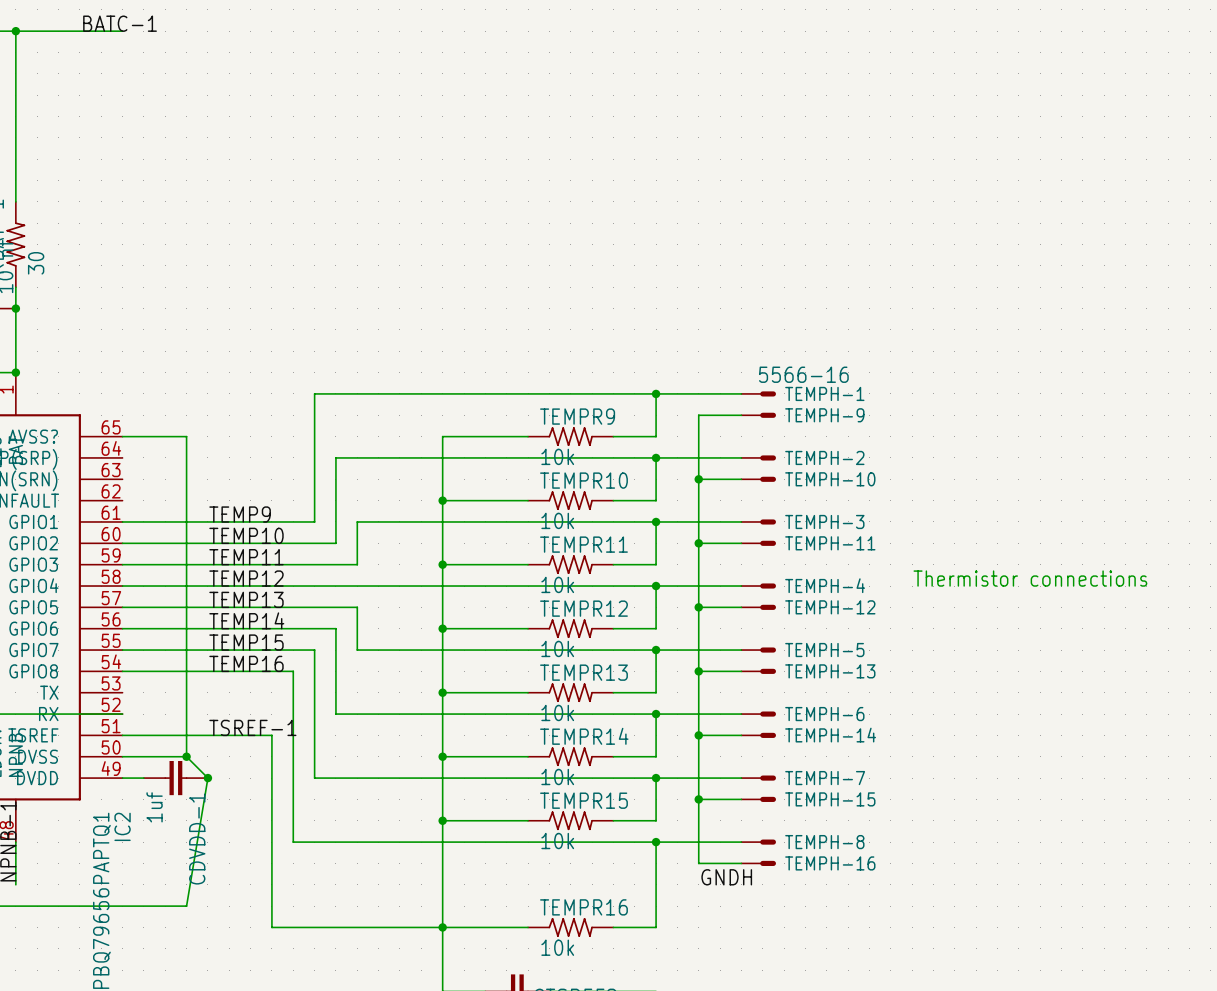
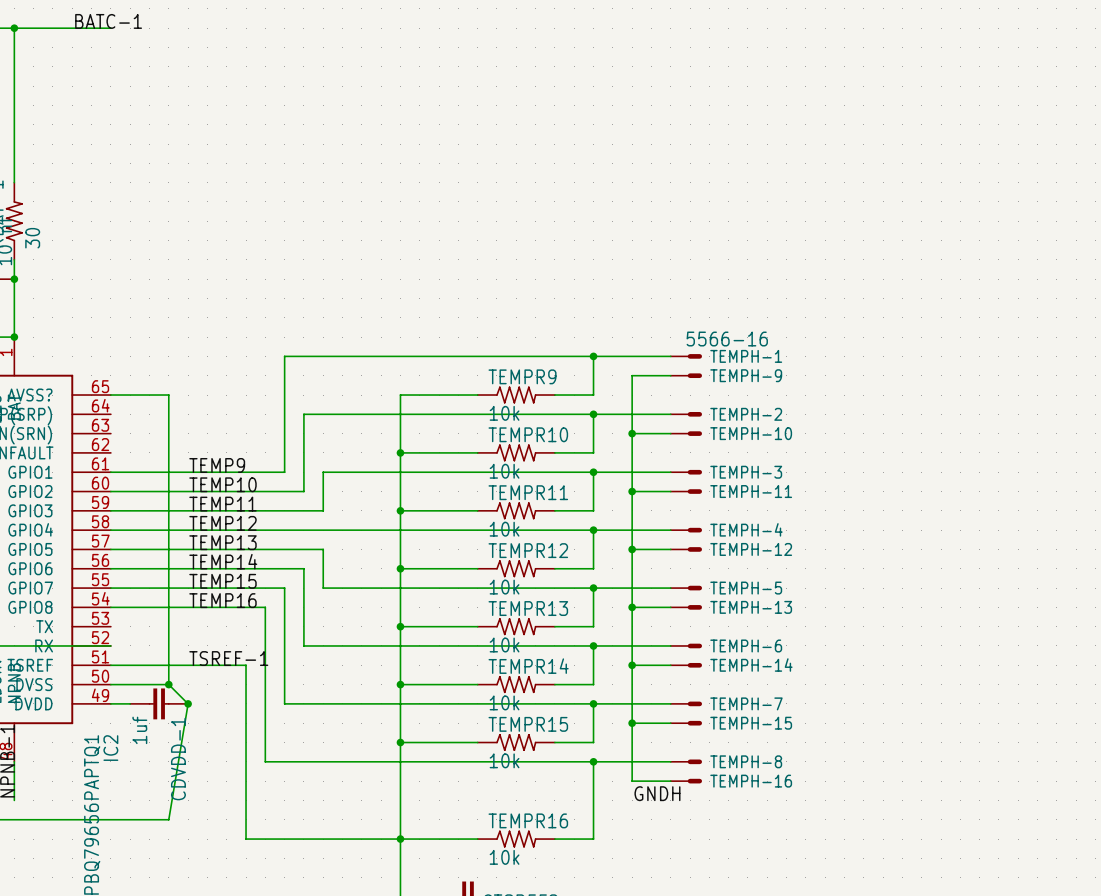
text: Thermistor connections (1030, 578) -> none

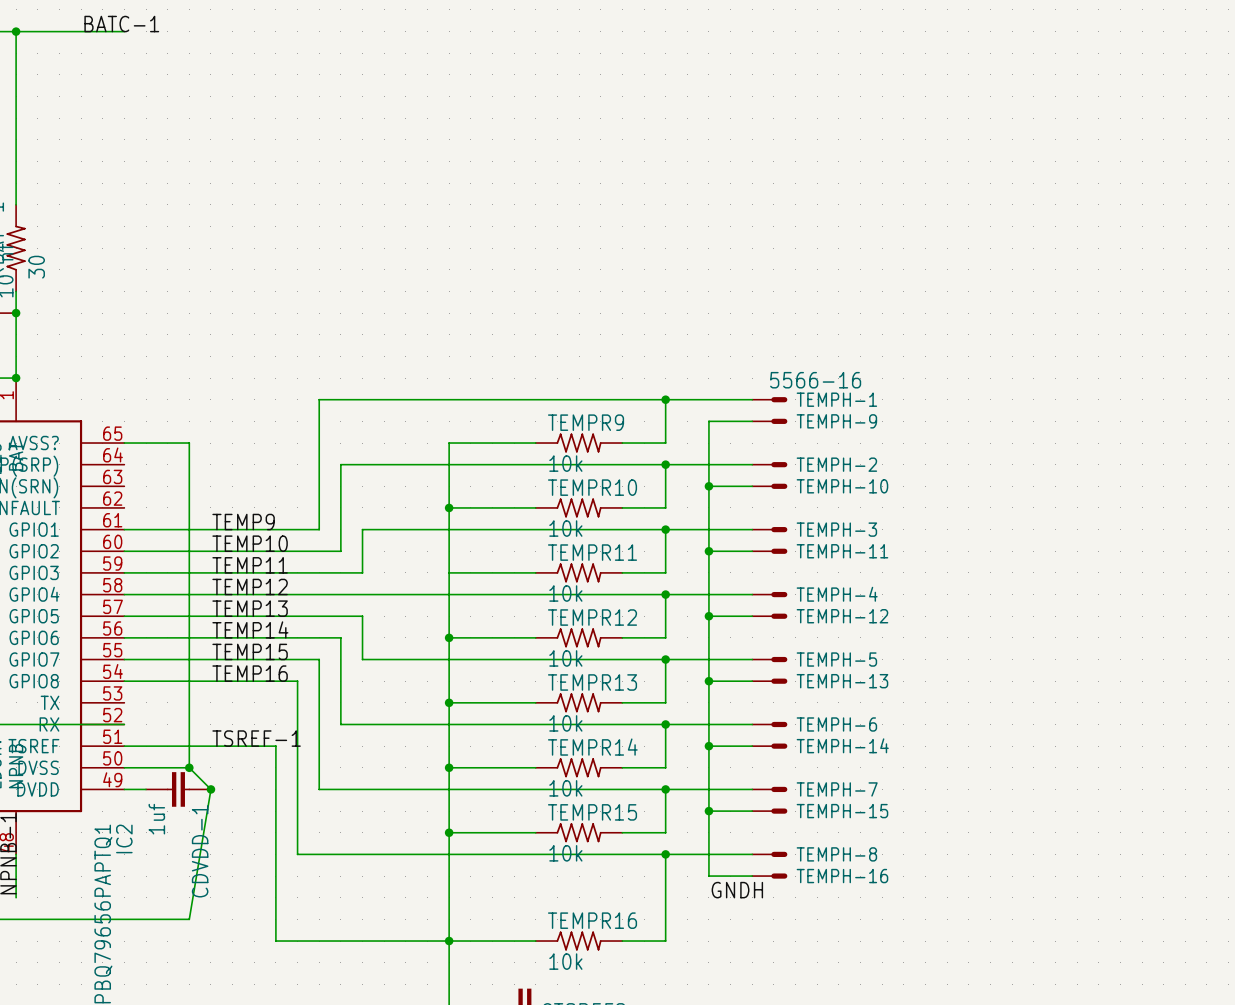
junction: (400, 510) -> none

